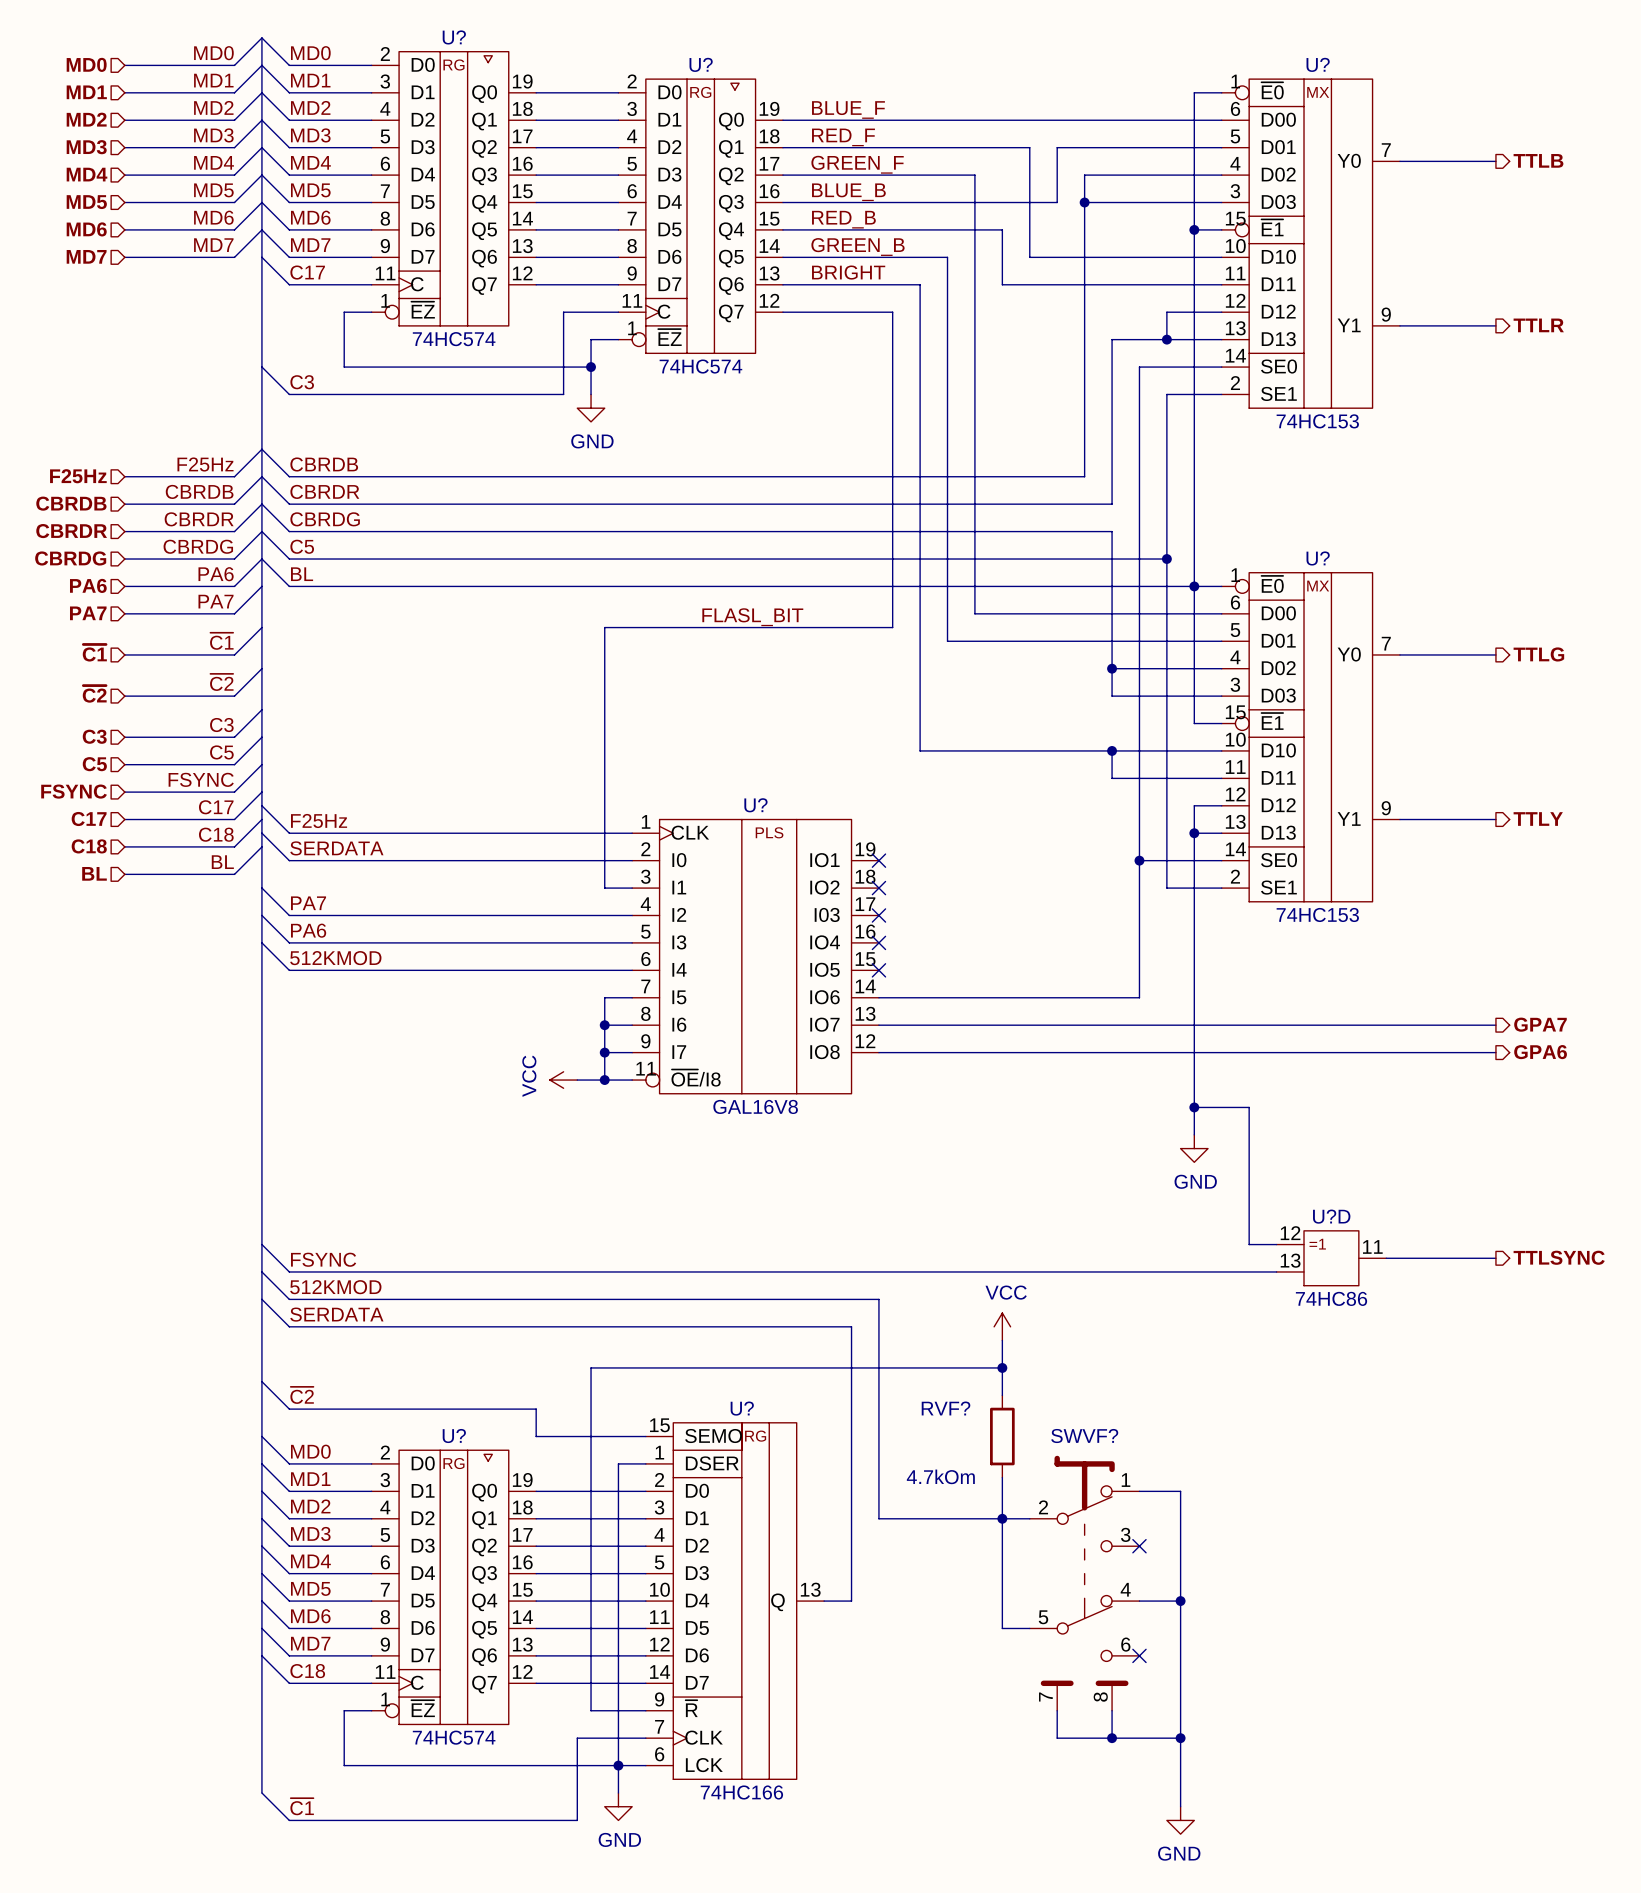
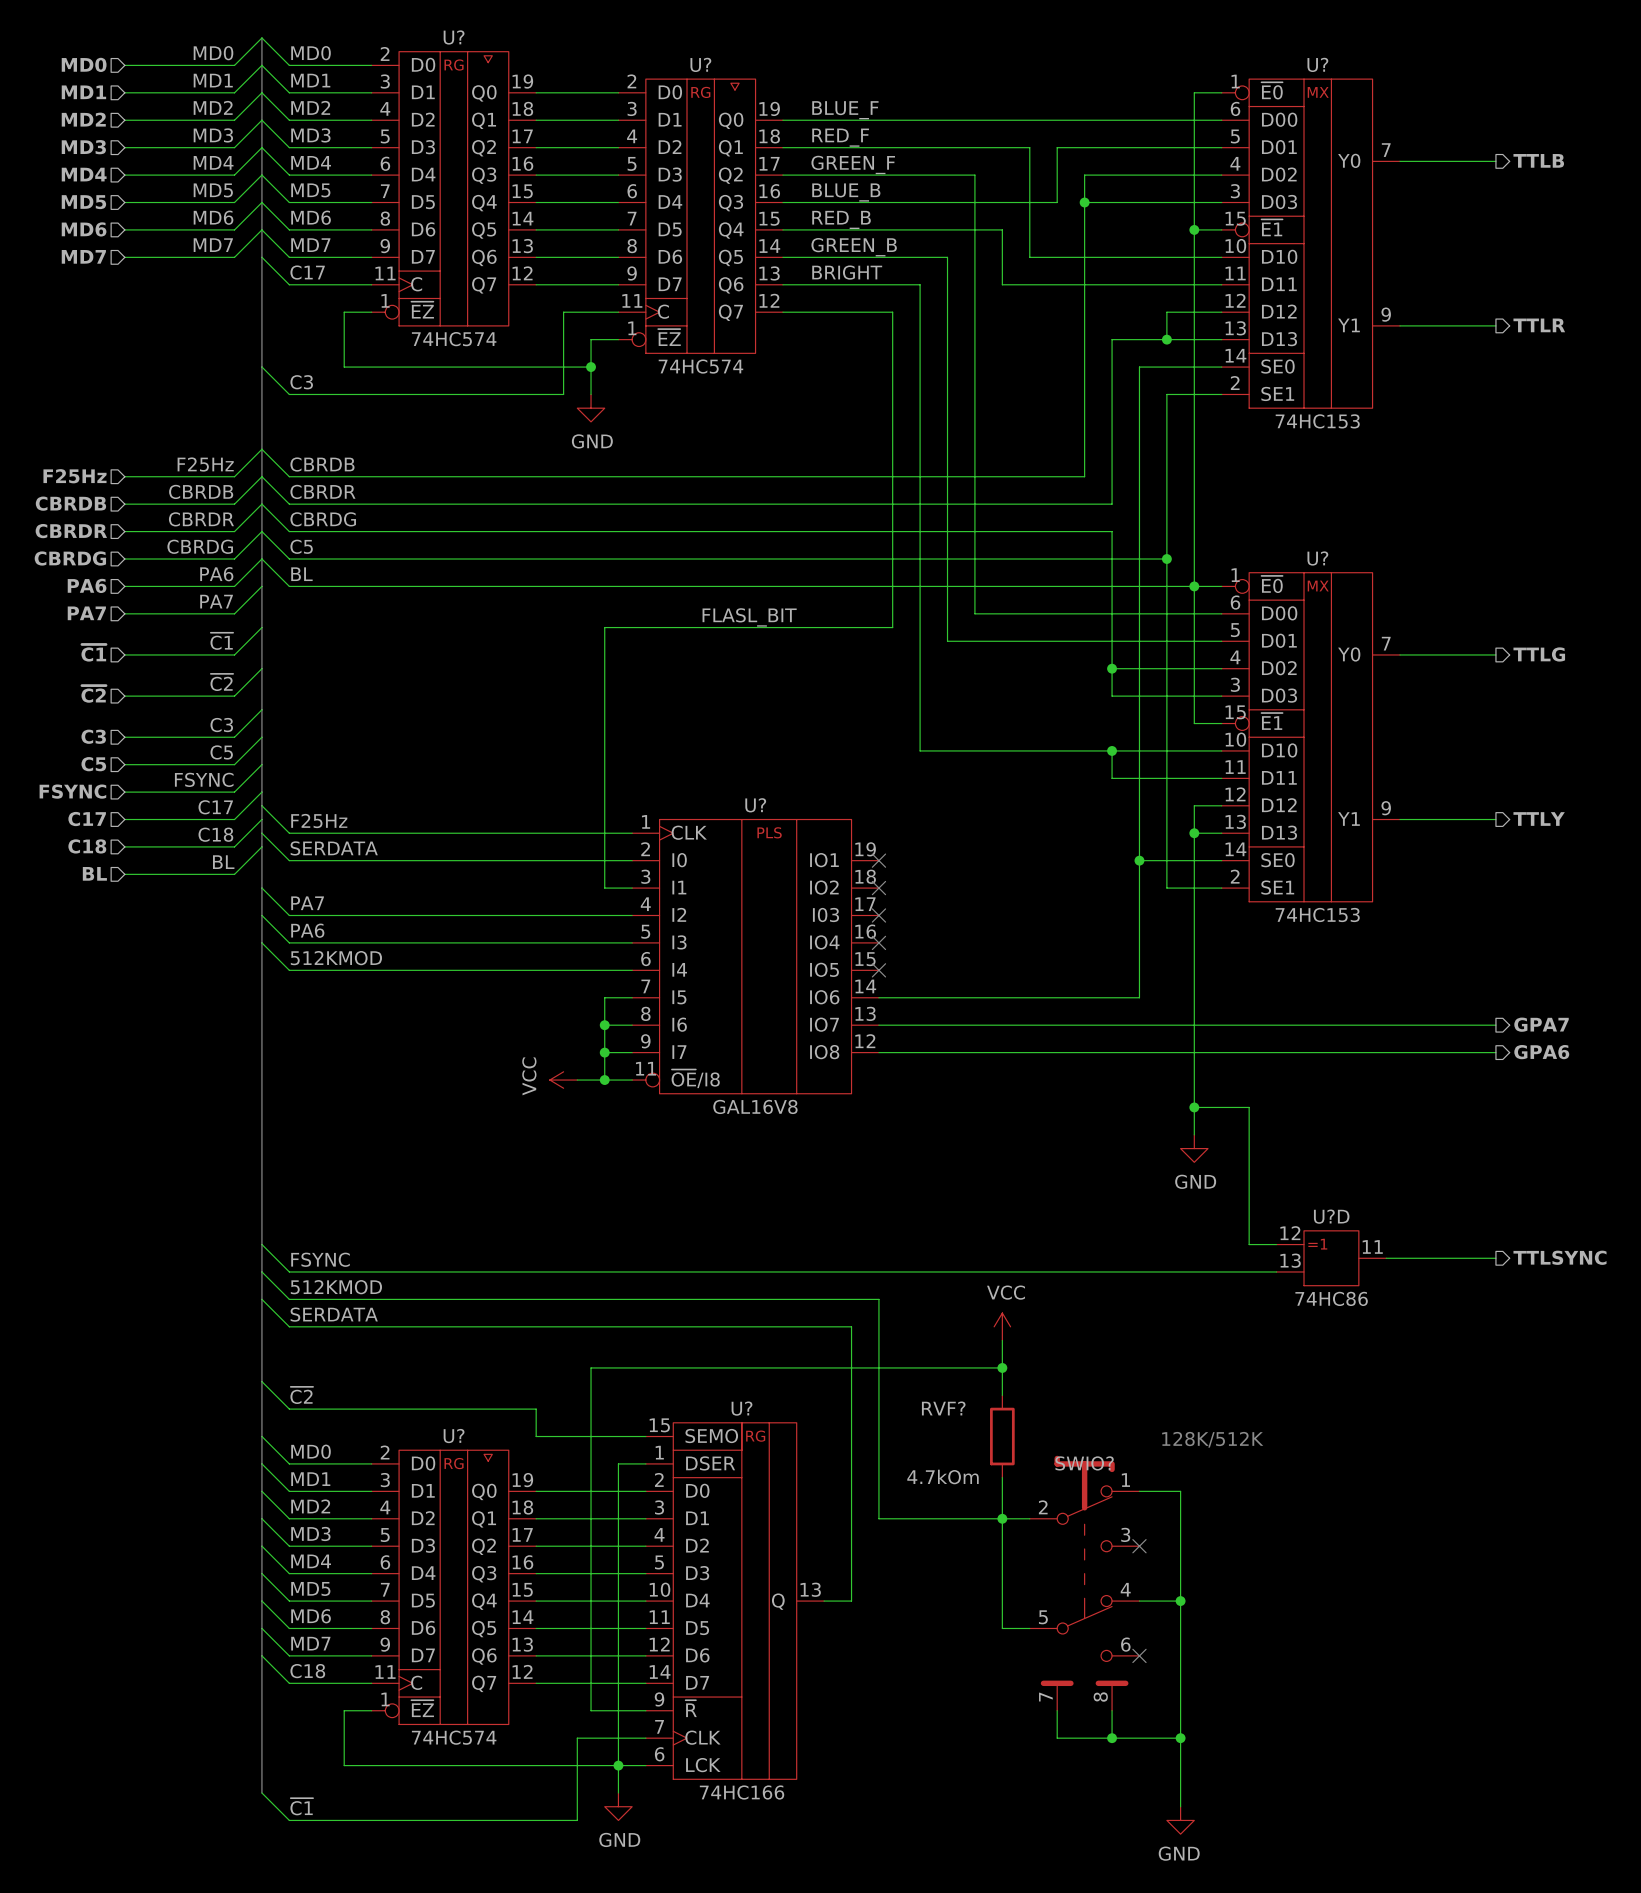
SWVF? name: SWVF? (1084, 1436) -> SWIO? (1084, 1463)
text: none -> 128K/512K (1212, 1439)

